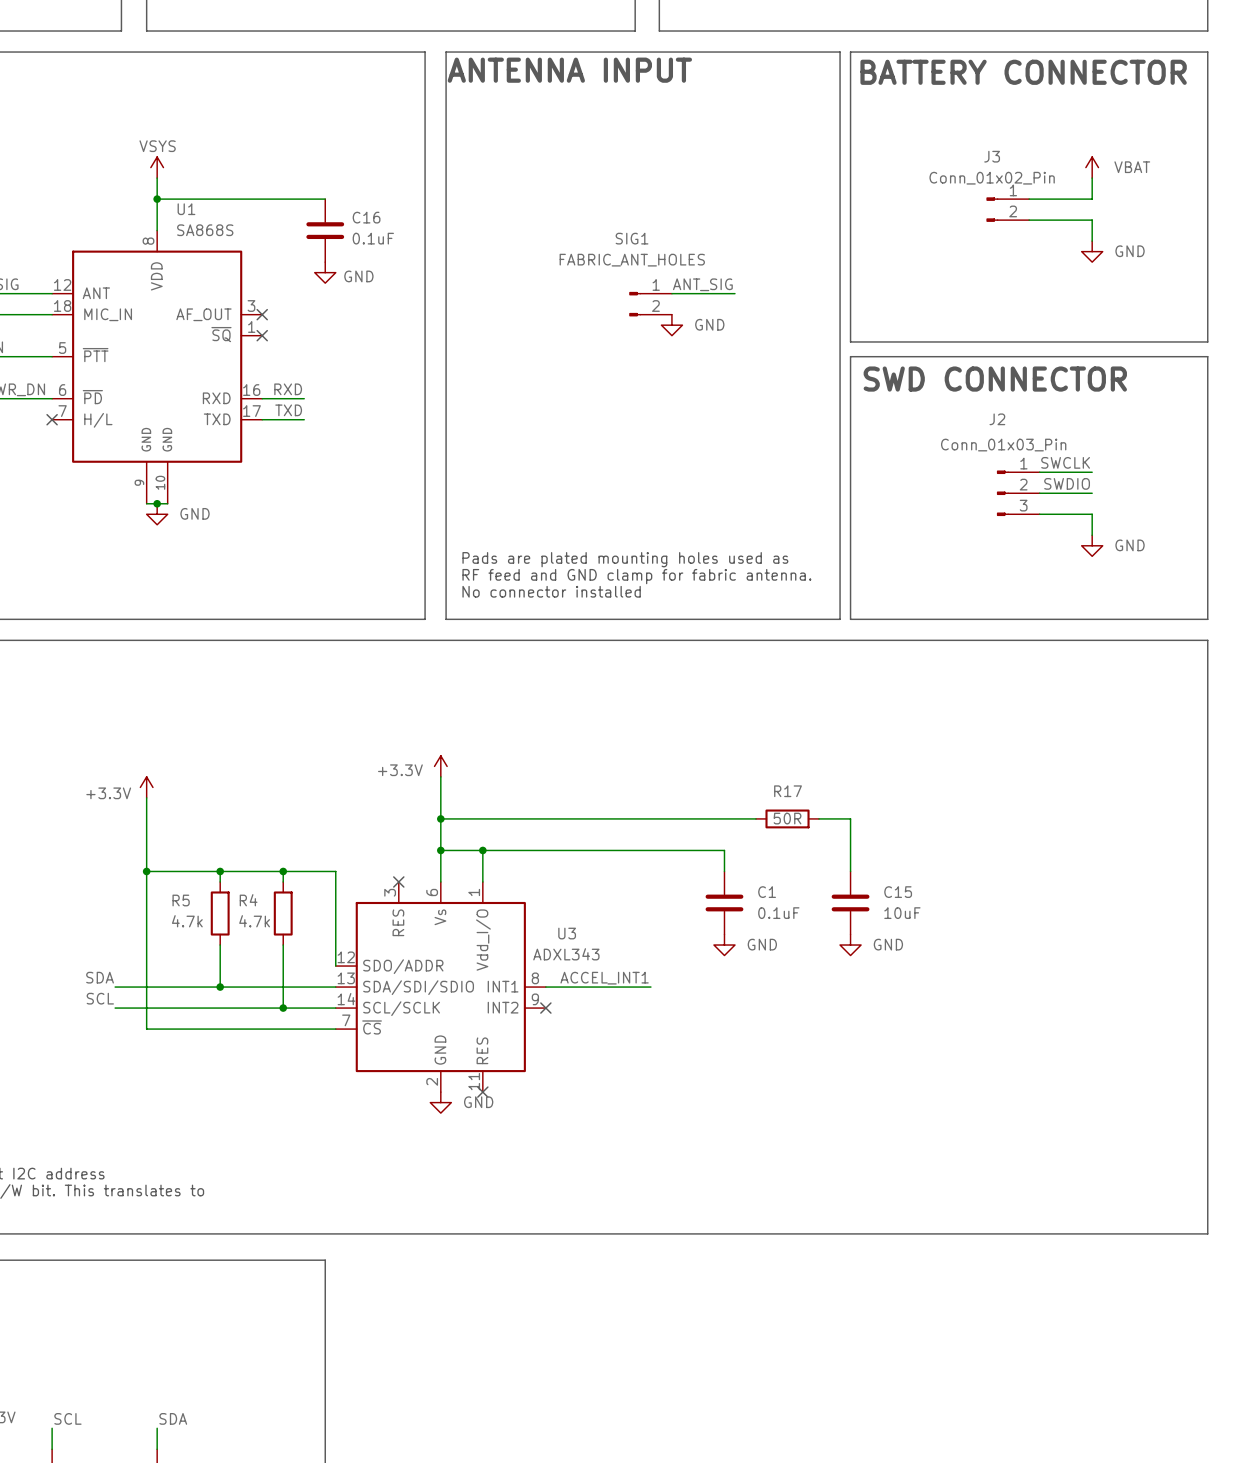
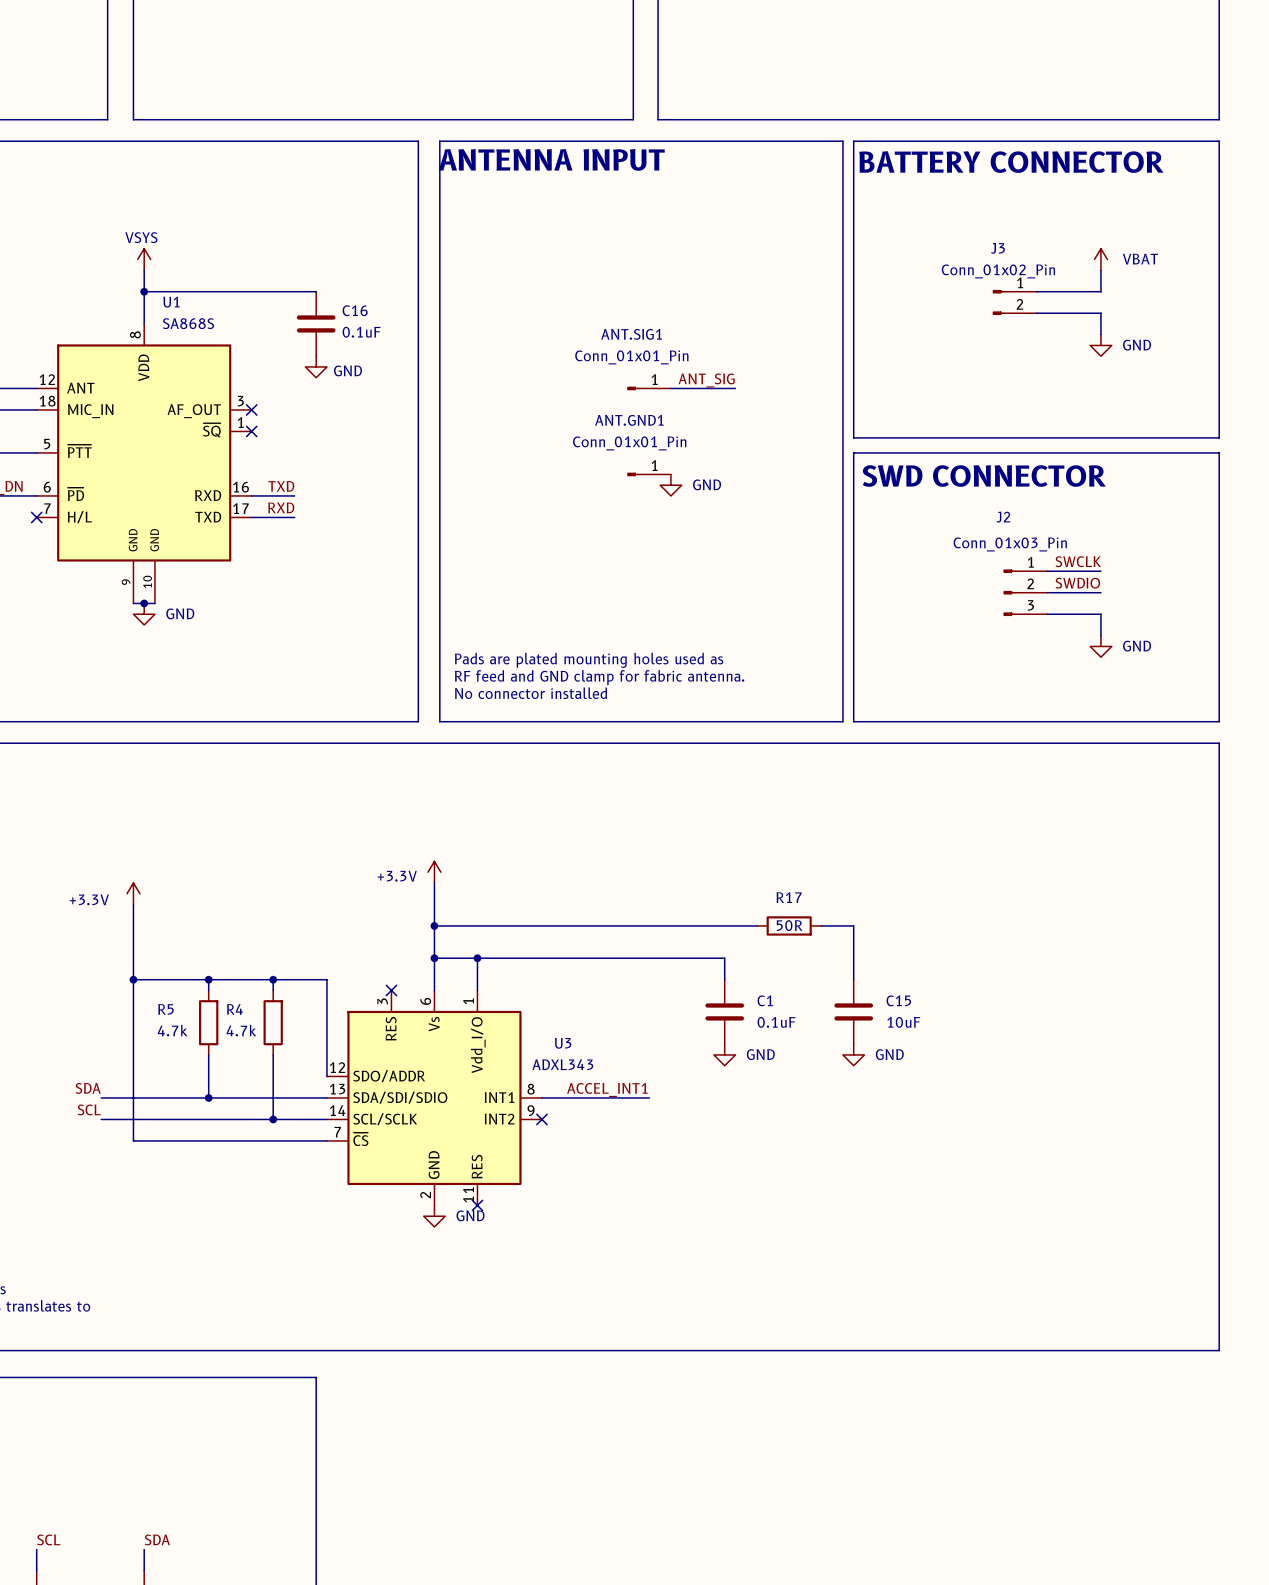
ANT.SIG1: none -> Conn_01x01_Pin (649, 388)
SIG1: FABRIC_ANT_HOLES (650, 304) -> none
power symbol position: GND (671, 325) -> GND (670, 485)
ANT.GND1: none -> Conn_01x01_Pin (649, 474)
label: RXD (288, 389) -> TXD (281, 486)
label: TXD (288, 410) -> RXD (281, 507)

